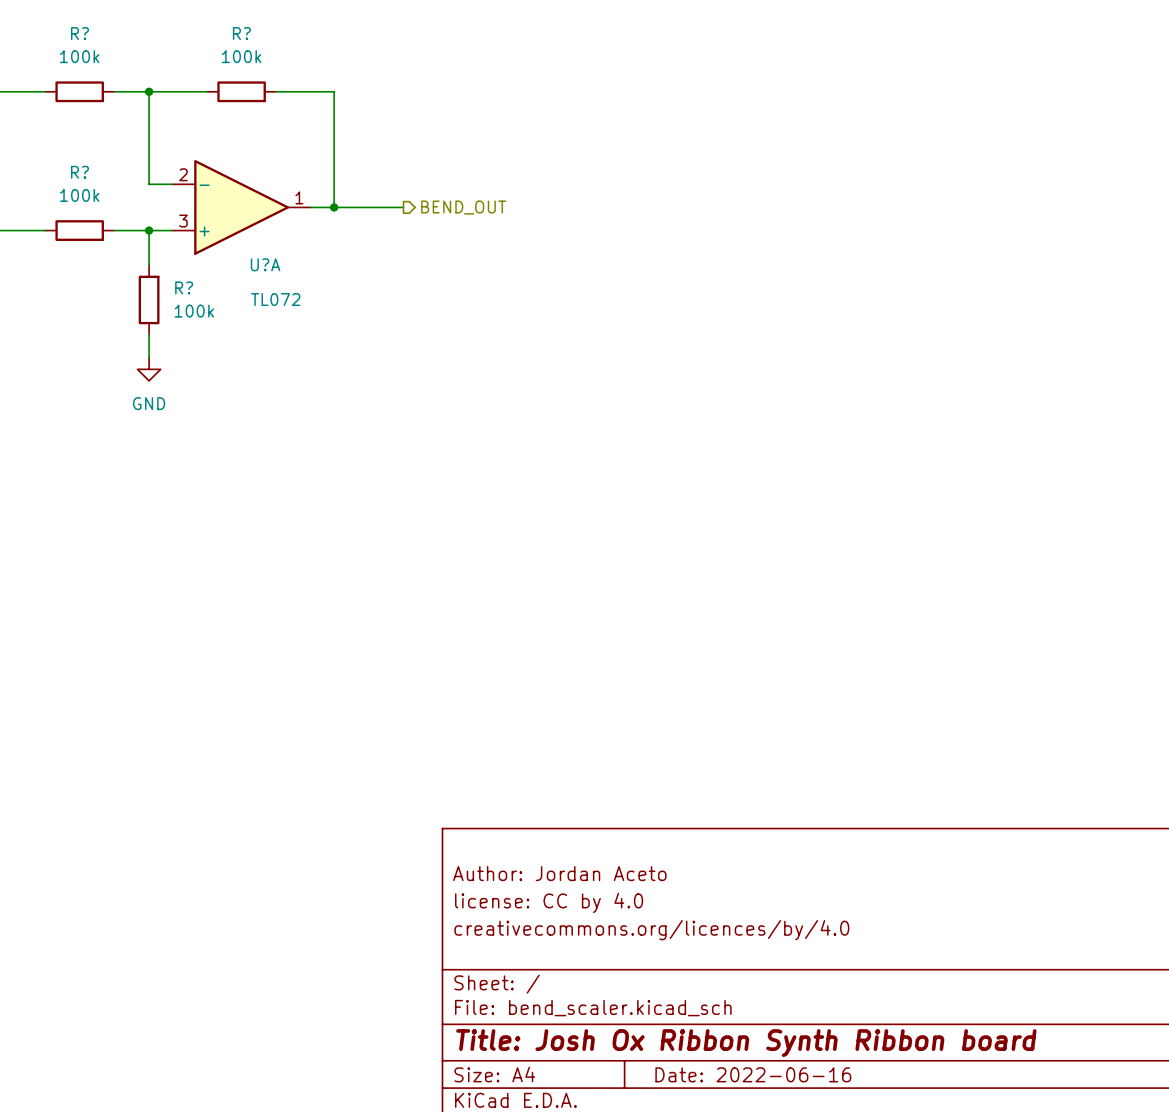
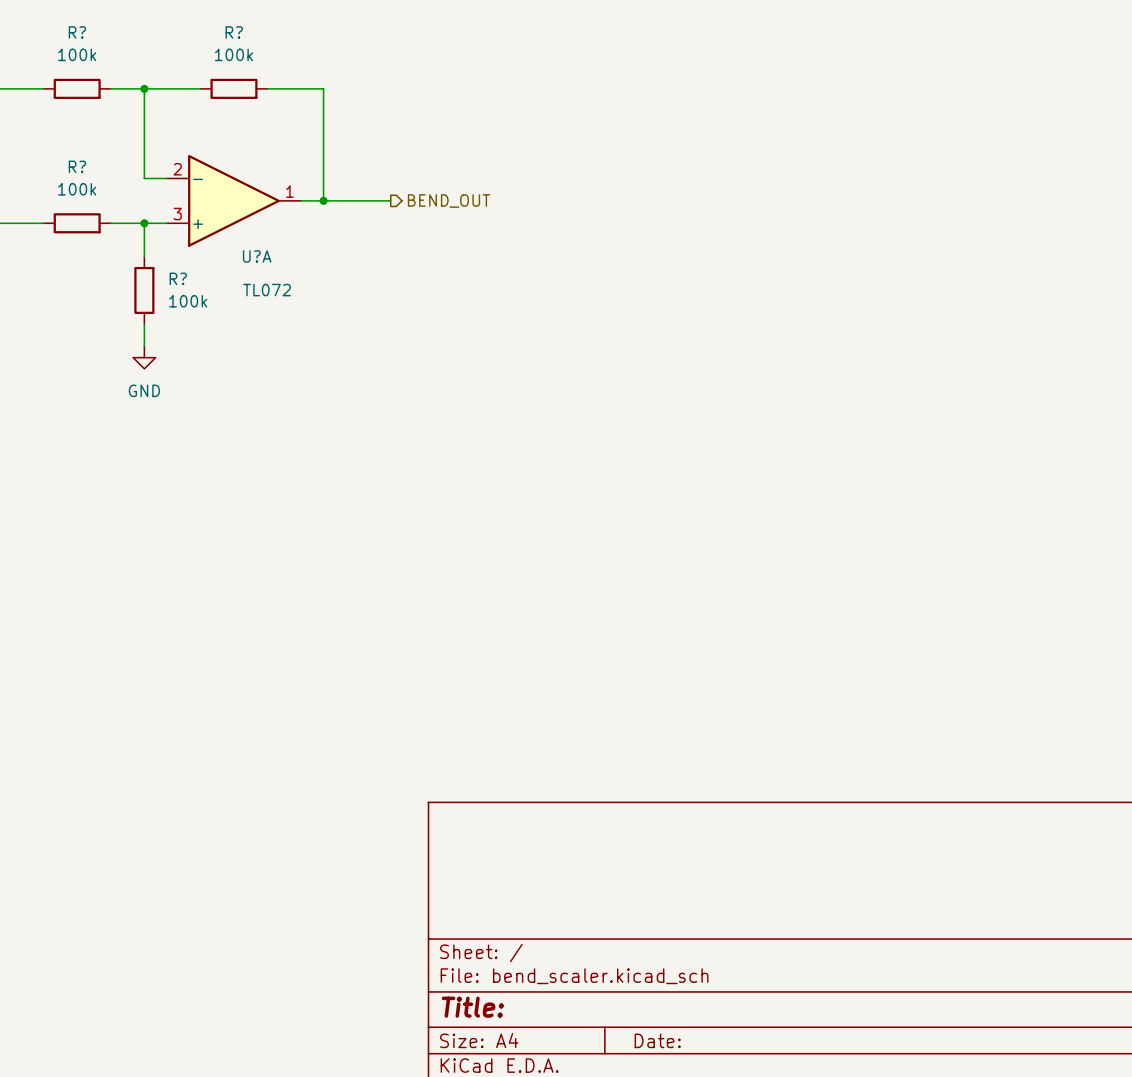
title block: Author: Jordan Aceto (559, 873) -> none
title block: license: CC by 4.0 (549, 902) -> none
title block: creativecommons.org/licences/by/4.0 (651, 930) -> none
title block: Title: Josh Ox Ribbon Synth Ribbon board (746, 1043) -> Title: (472, 1007)
title block: Date: 2022-06-16 (753, 1074) -> Date: (657, 1040)

